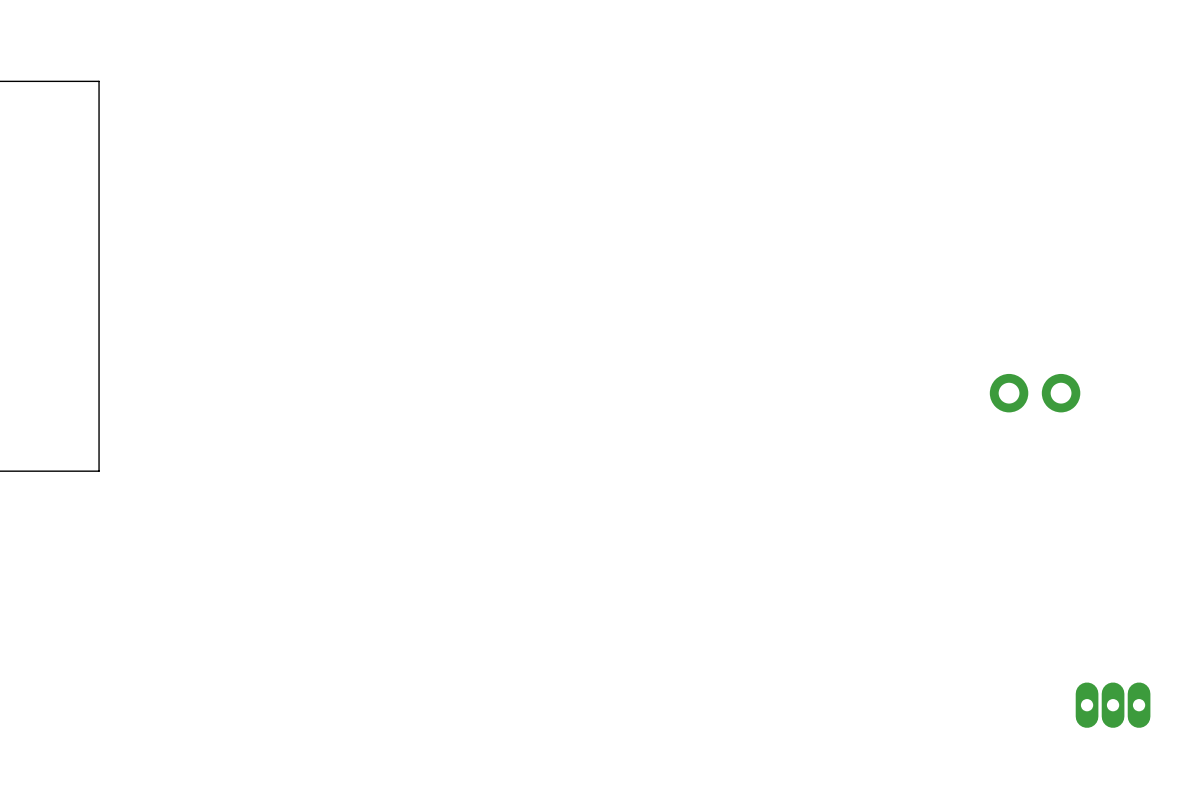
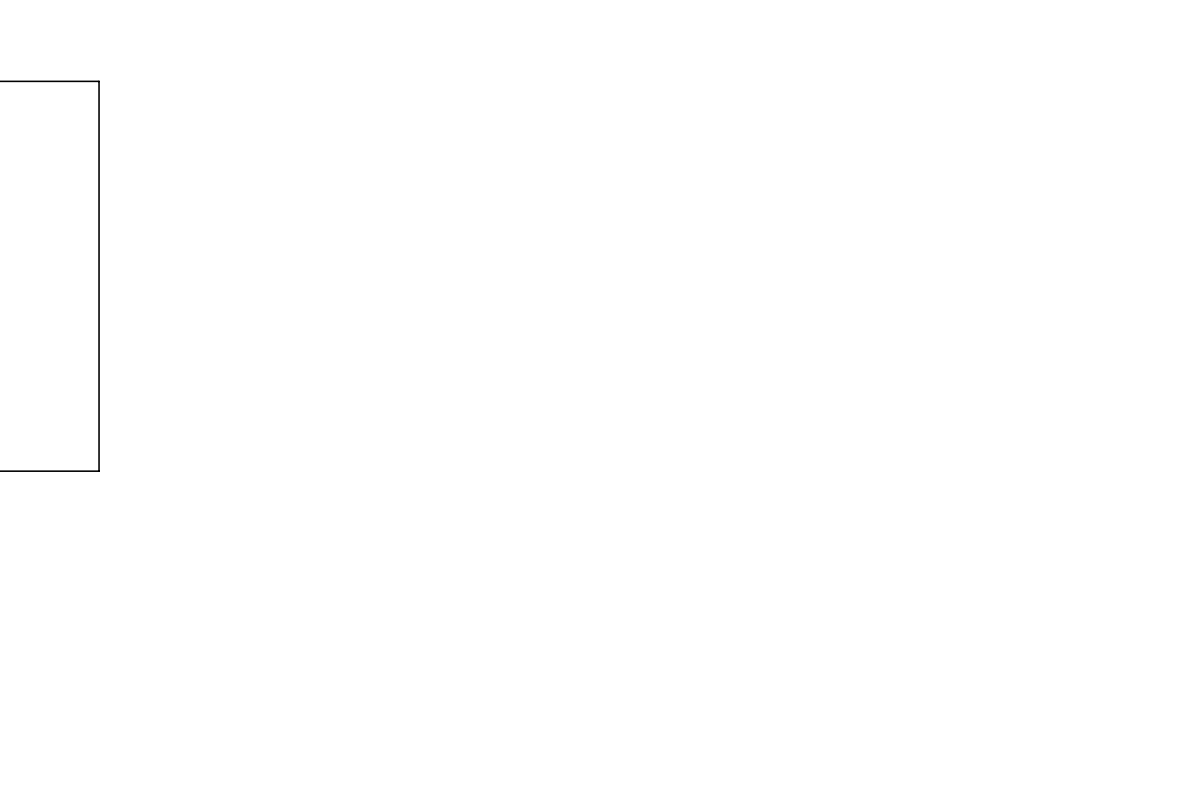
part: (1035, 393) -> none
part: (1113, 705) -> none

